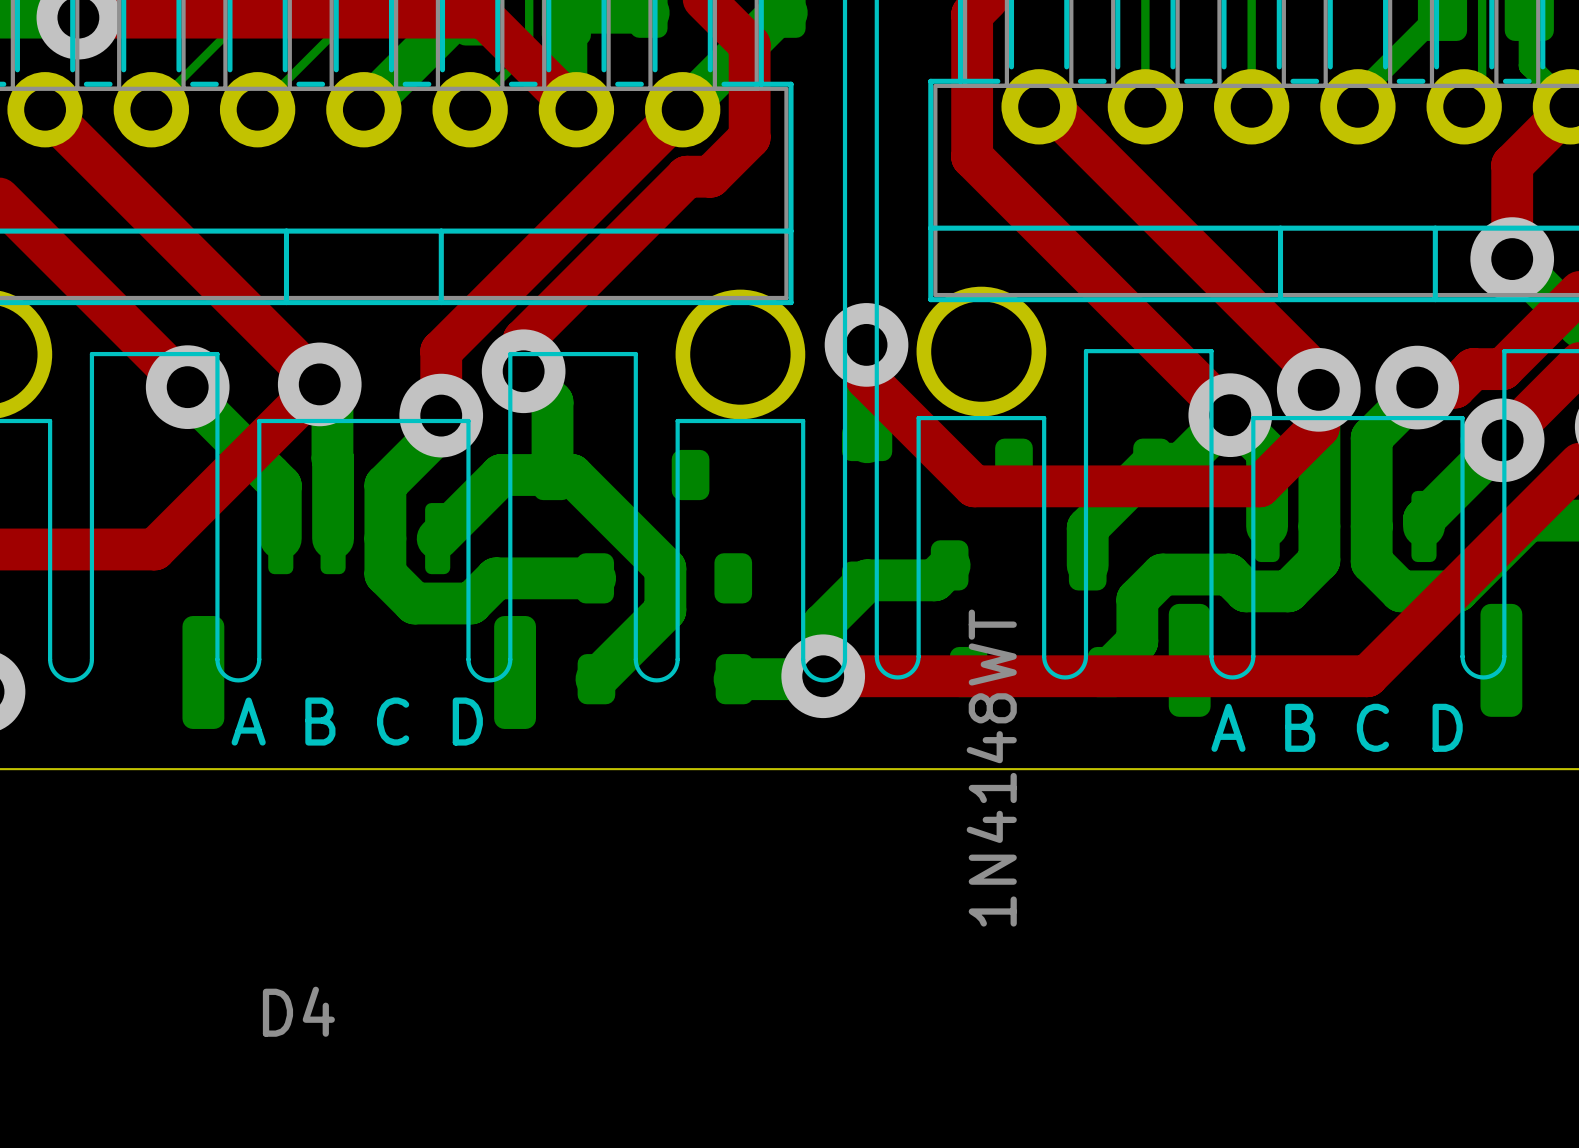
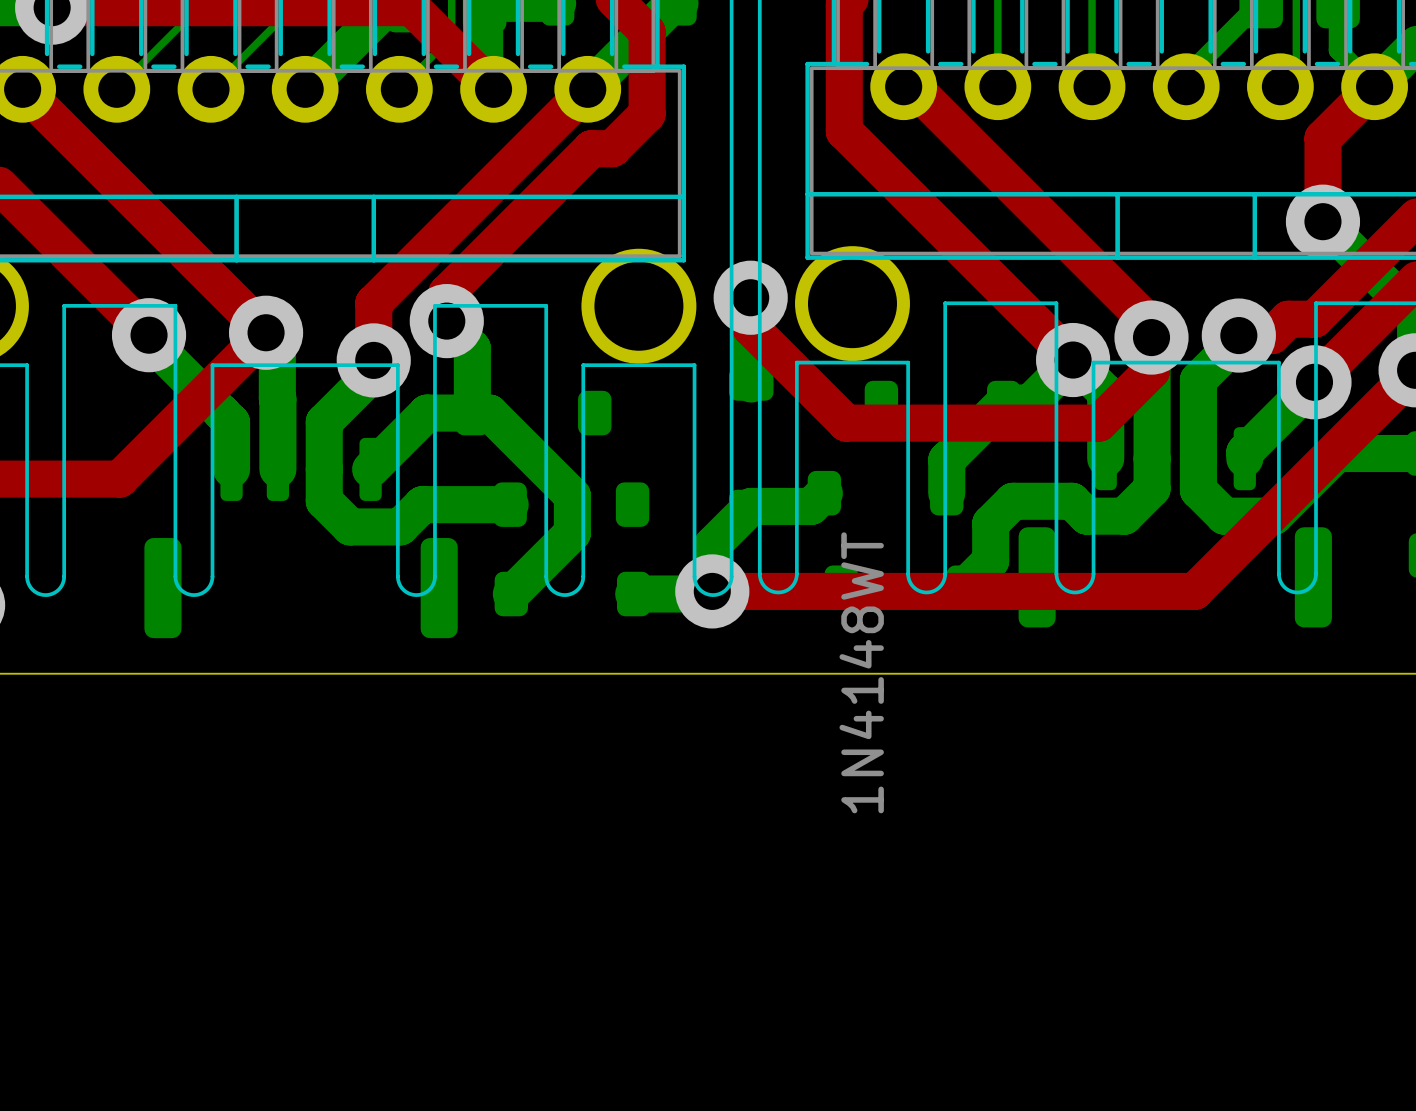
text: A B C D (357, 721) -> none
text: A B C D (1337, 727) -> none
text: D4 (298, 1011) -> none

